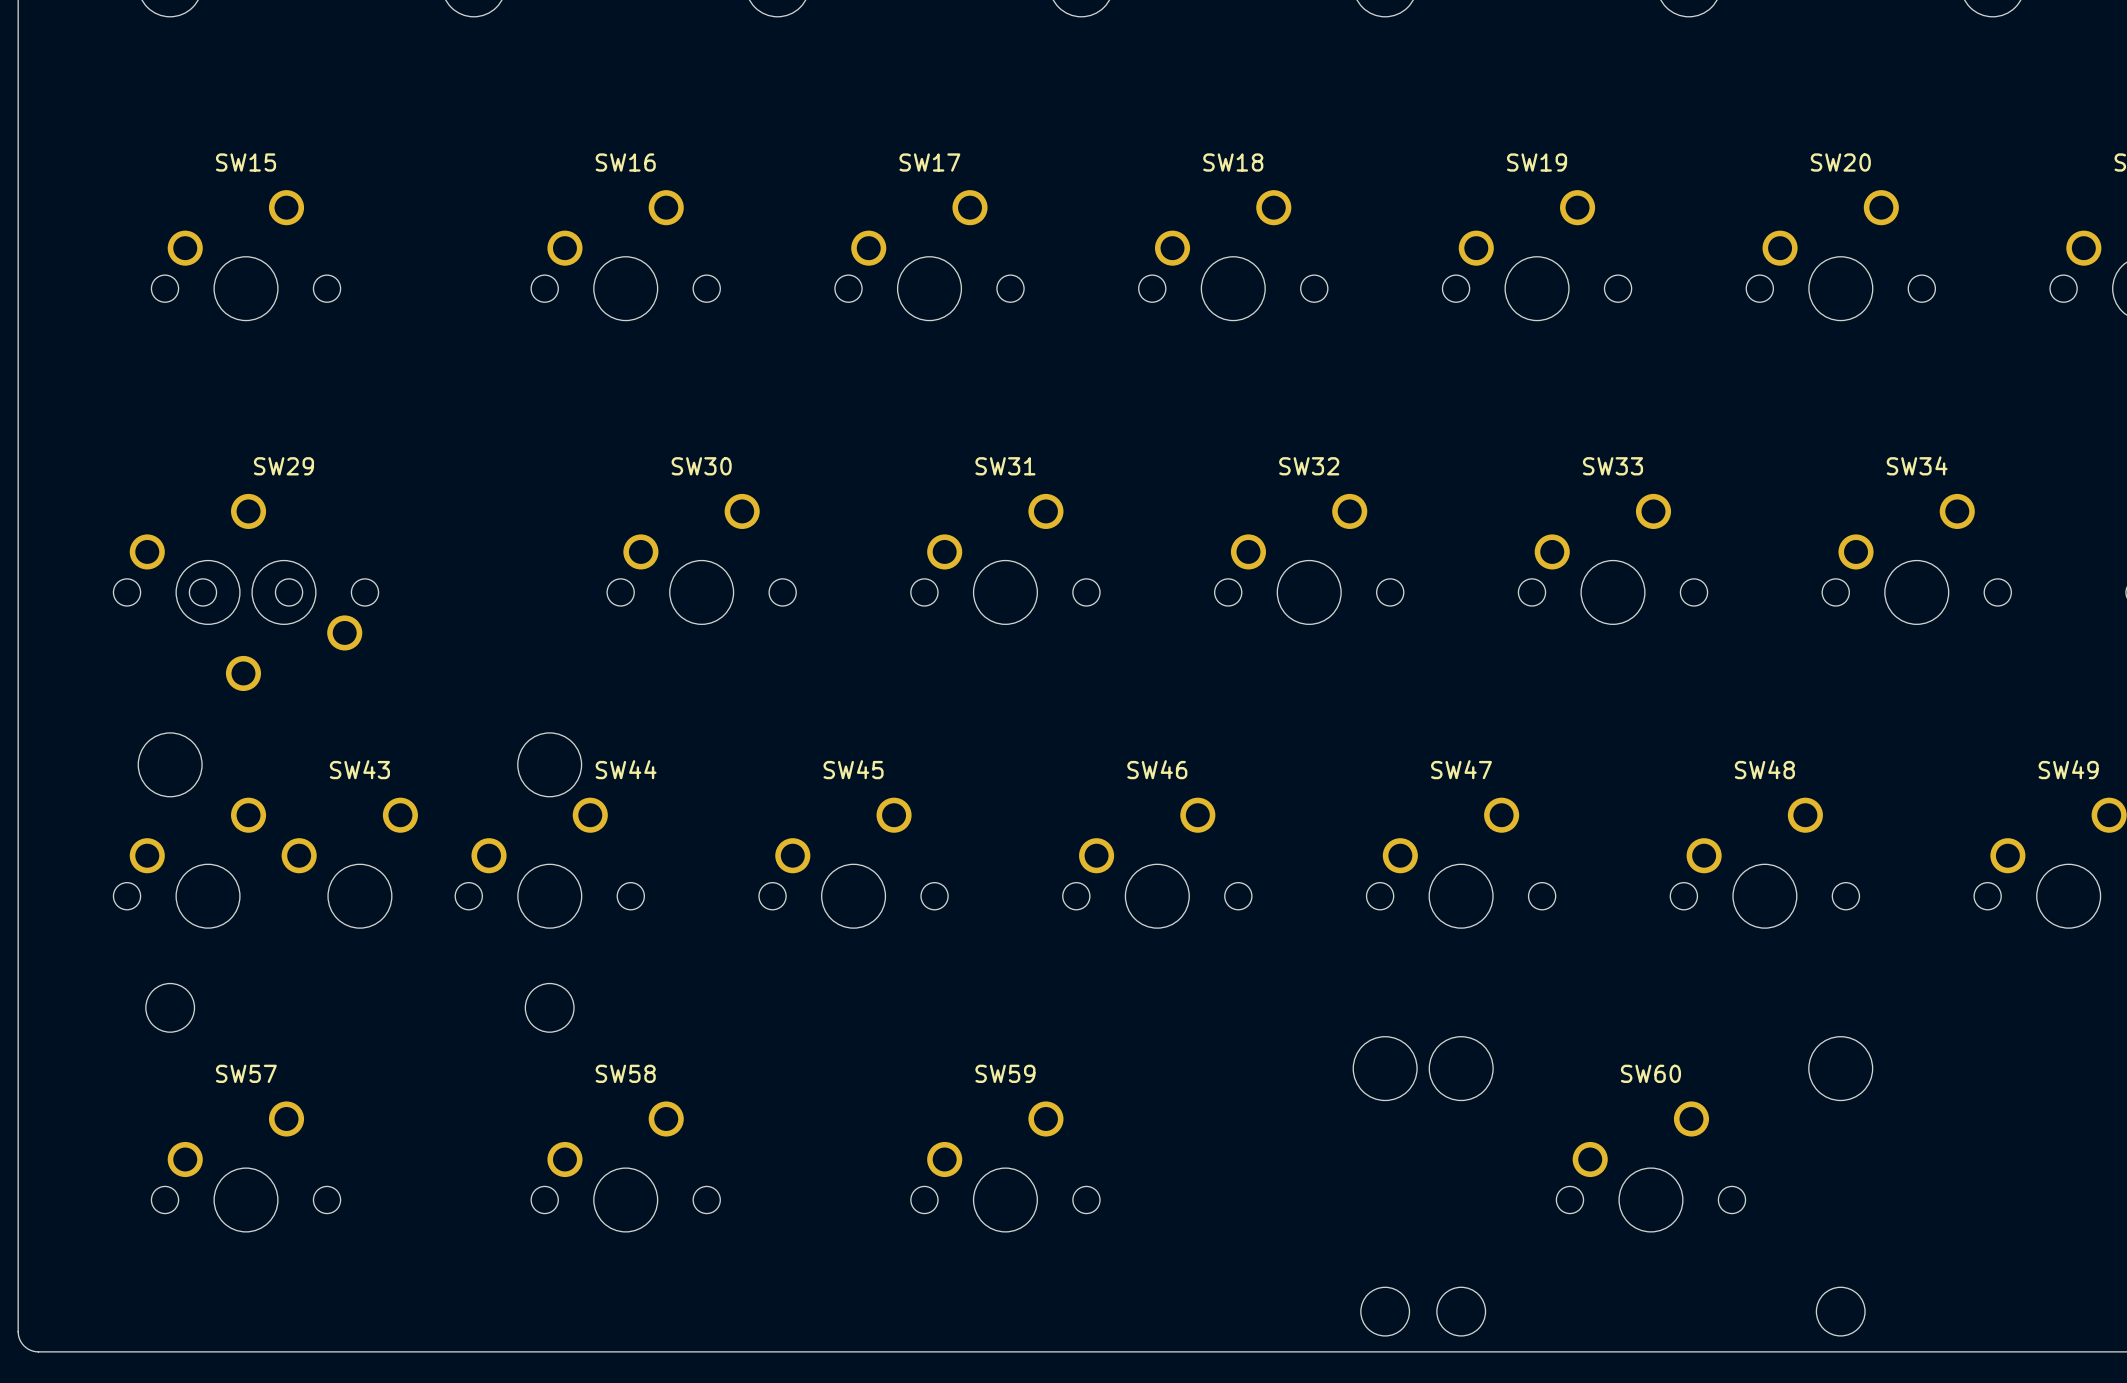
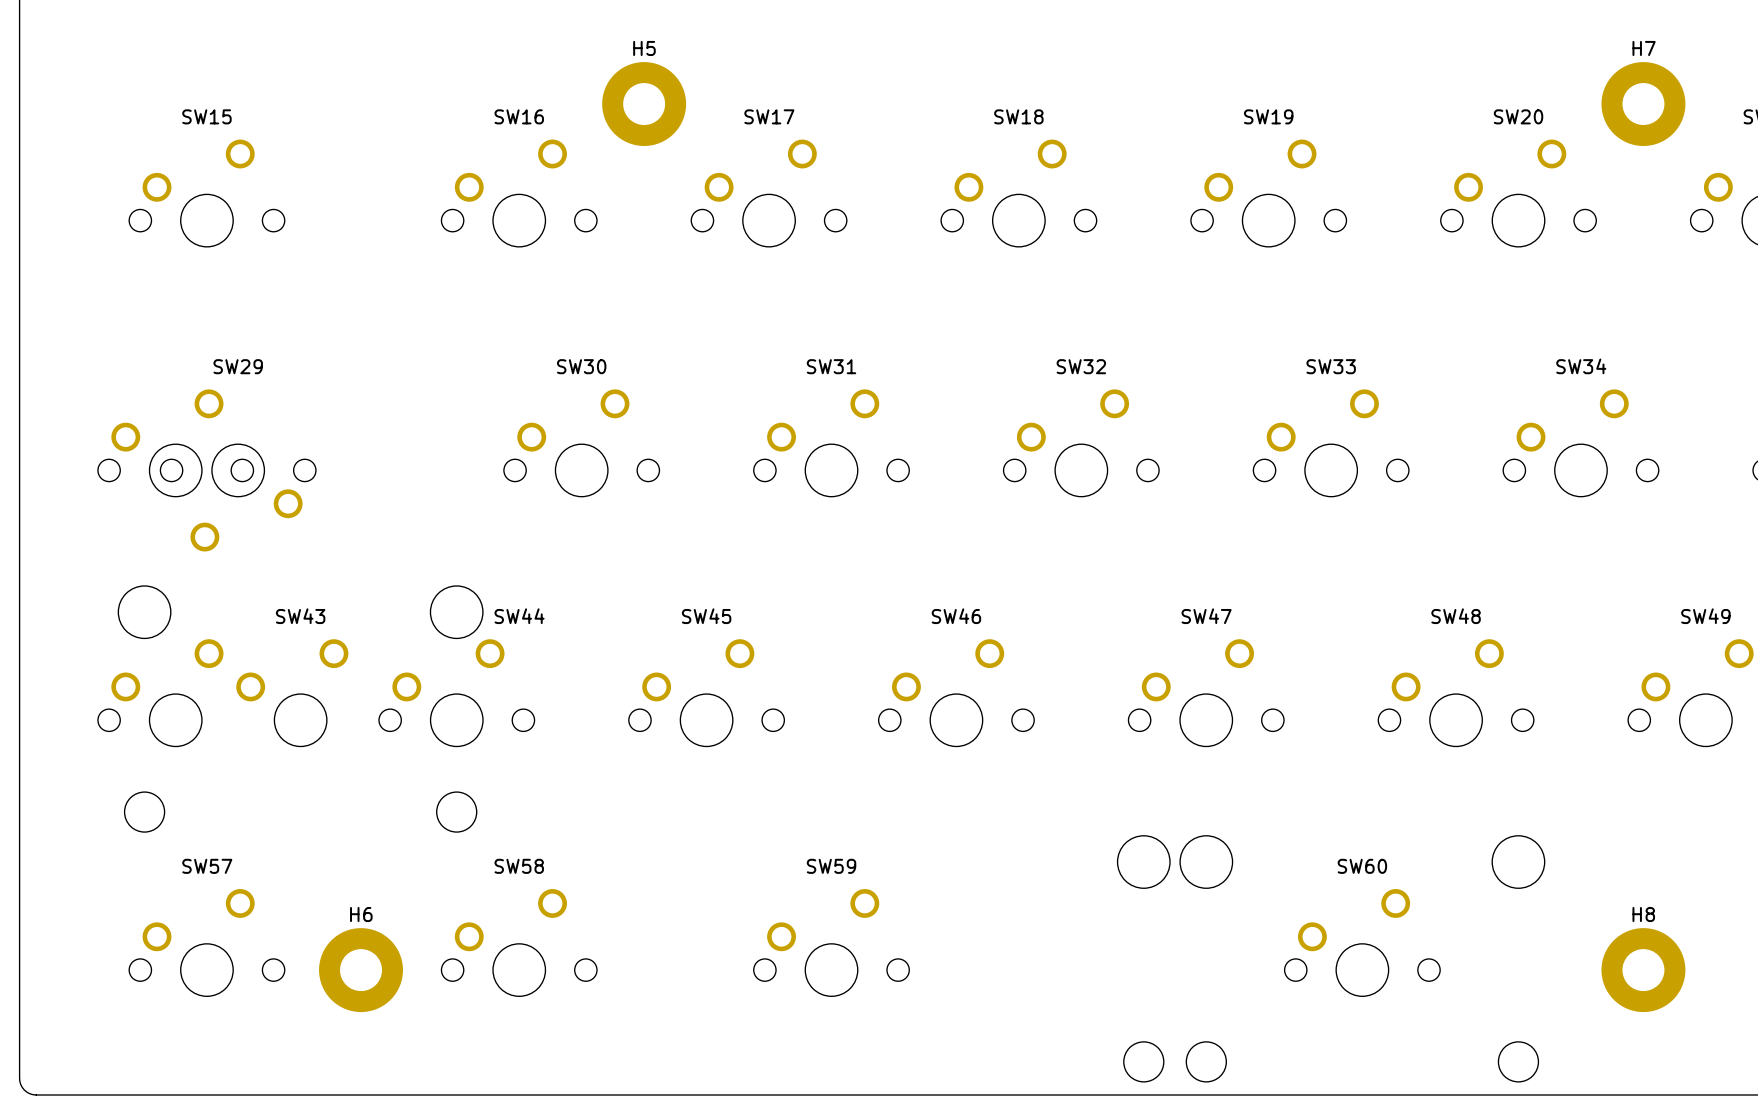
H5: none -> (644, 104)
H7: none -> (1643, 104)
H6: none -> (361, 970)
H8: none -> (1643, 970)

